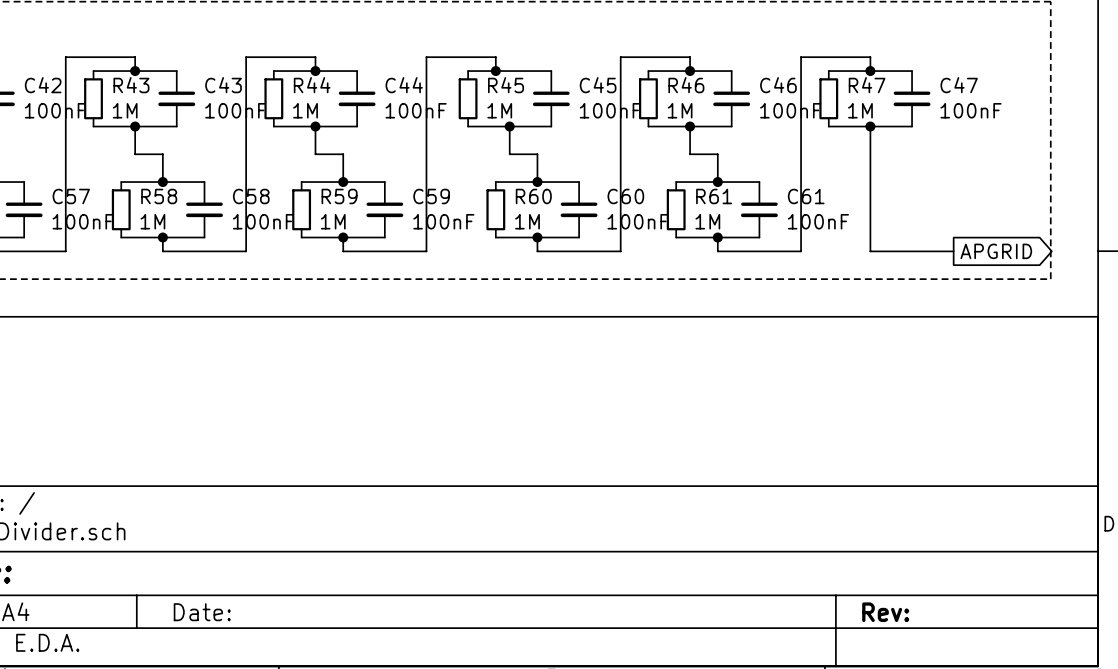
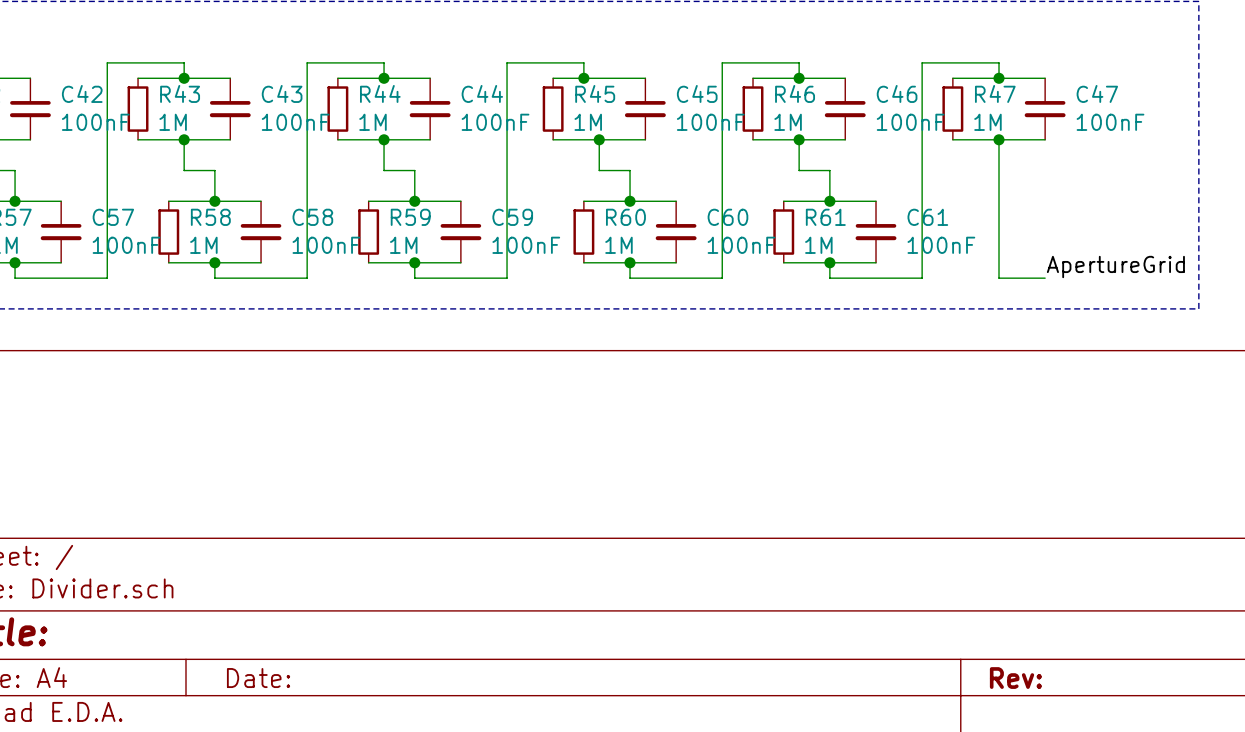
label: none -> ApertureGrid (1115, 267)
wire: (912, 251) (953, 251) -> none
global label: APGRID (996, 251) -> none

